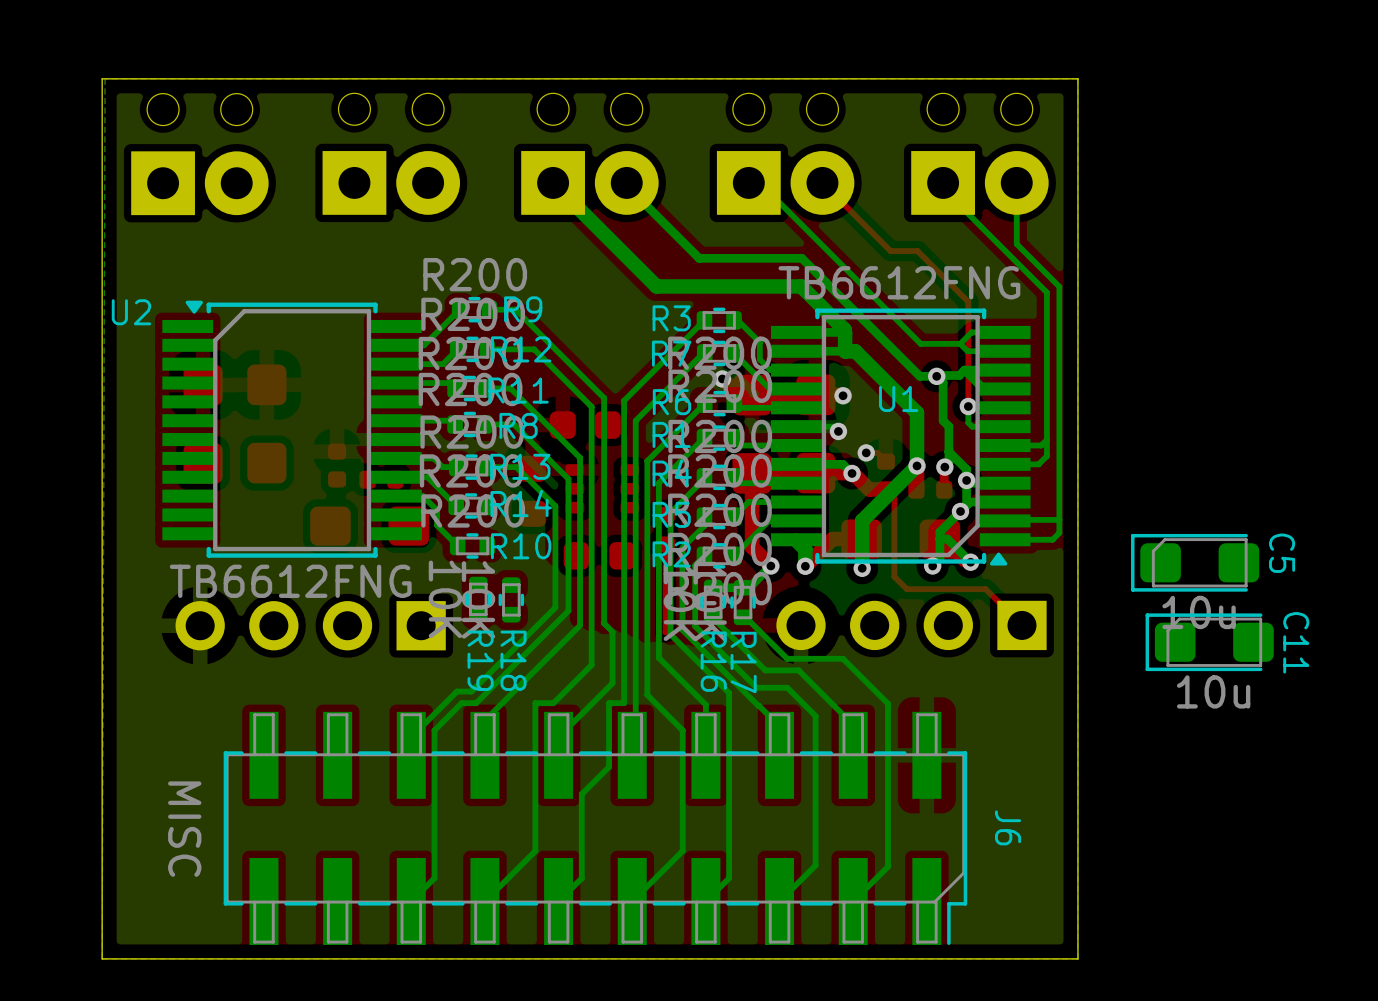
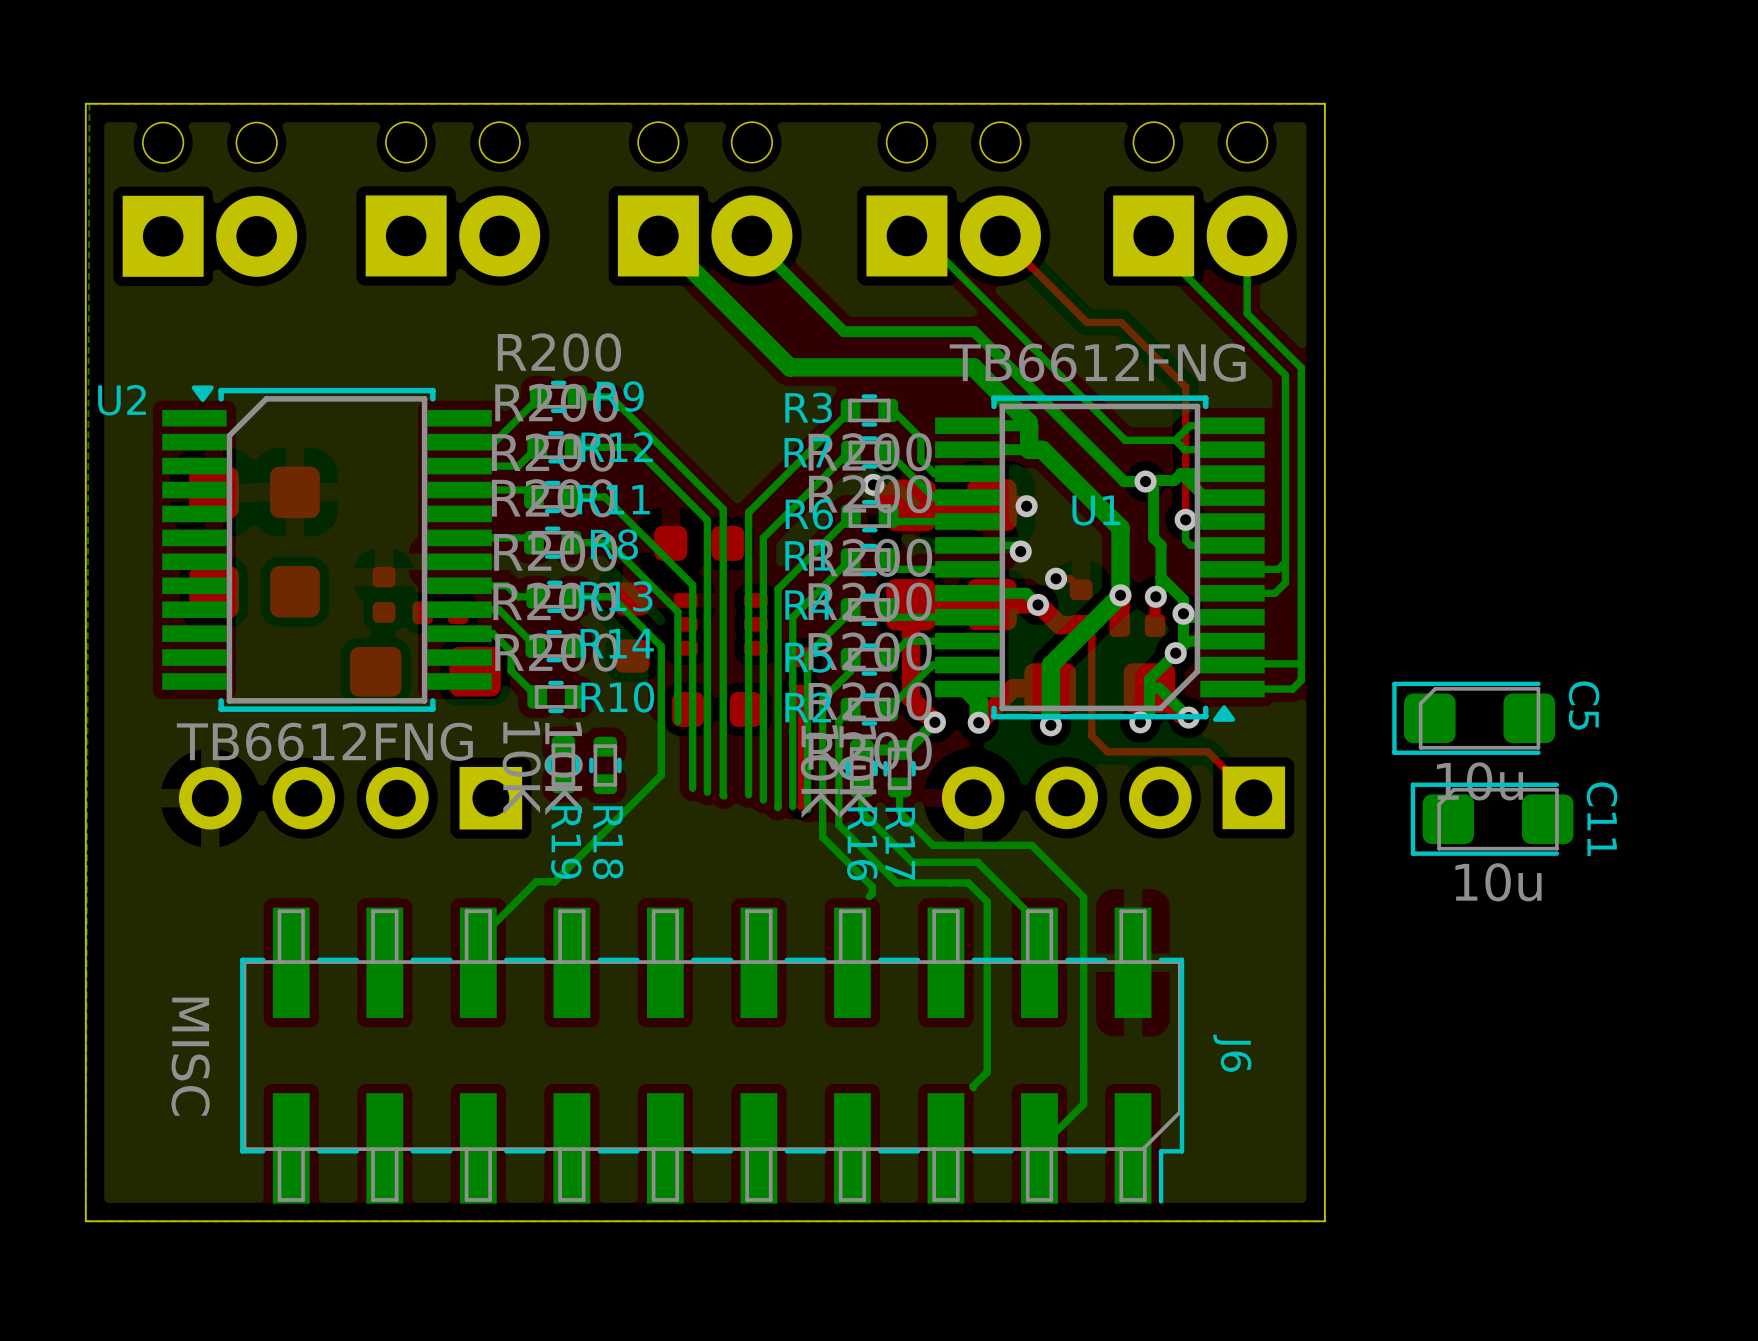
bottom track: (568, 565) (568, 610) (476, 703) (461, 703) (434, 730) (434, 878) (411, 901) -> none
bottom track: (580, 617) (580, 625) (484, 720) (484, 755) -> none
bottom track: (743, 617) (745, 617) (787, 658) (843, 658) (847, 662) -> (899, 787) (899, 811) (933, 845) (1031, 845)
bottom track: (713, 618) (765, 670) (798, 670) (804, 676) -> (861, 788) (861, 811) (912, 862) (977, 862)
bottom track: (591, 621) (591, 665) (553, 703) (535, 703) (535, 851) (484, 901) -> none
bottom track: (604, 623) (612, 631) (612, 683) (558, 737) (558, 755) -> none
bottom track: (624, 623) (624, 703) (609, 703) (609, 766) (581, 794) (581, 878) (558, 901) -> none
bottom track: (695, 626) (756, 687) (787, 687) (815, 715) (815, 865) (779, 901) -> (838, 798) (838, 825) (896, 882) (968, 882) (987, 901) (987, 1072) (973, 1087)
bottom track: (635, 627) (635, 751) (632, 755) -> none
bottom track: (682, 629) (779, 726) (779, 755) -> (822, 803) (822, 837) (872, 886) (872, 893) (869, 896)
bottom track: (647, 632) (647, 695) (682, 730) (682, 851) (632, 901) -> none
bottom track: (658, 632) (658, 657) (705, 704) (705, 755) -> none
bottom track: (670, 634) (729, 693) (729, 878) (705, 901) -> none

